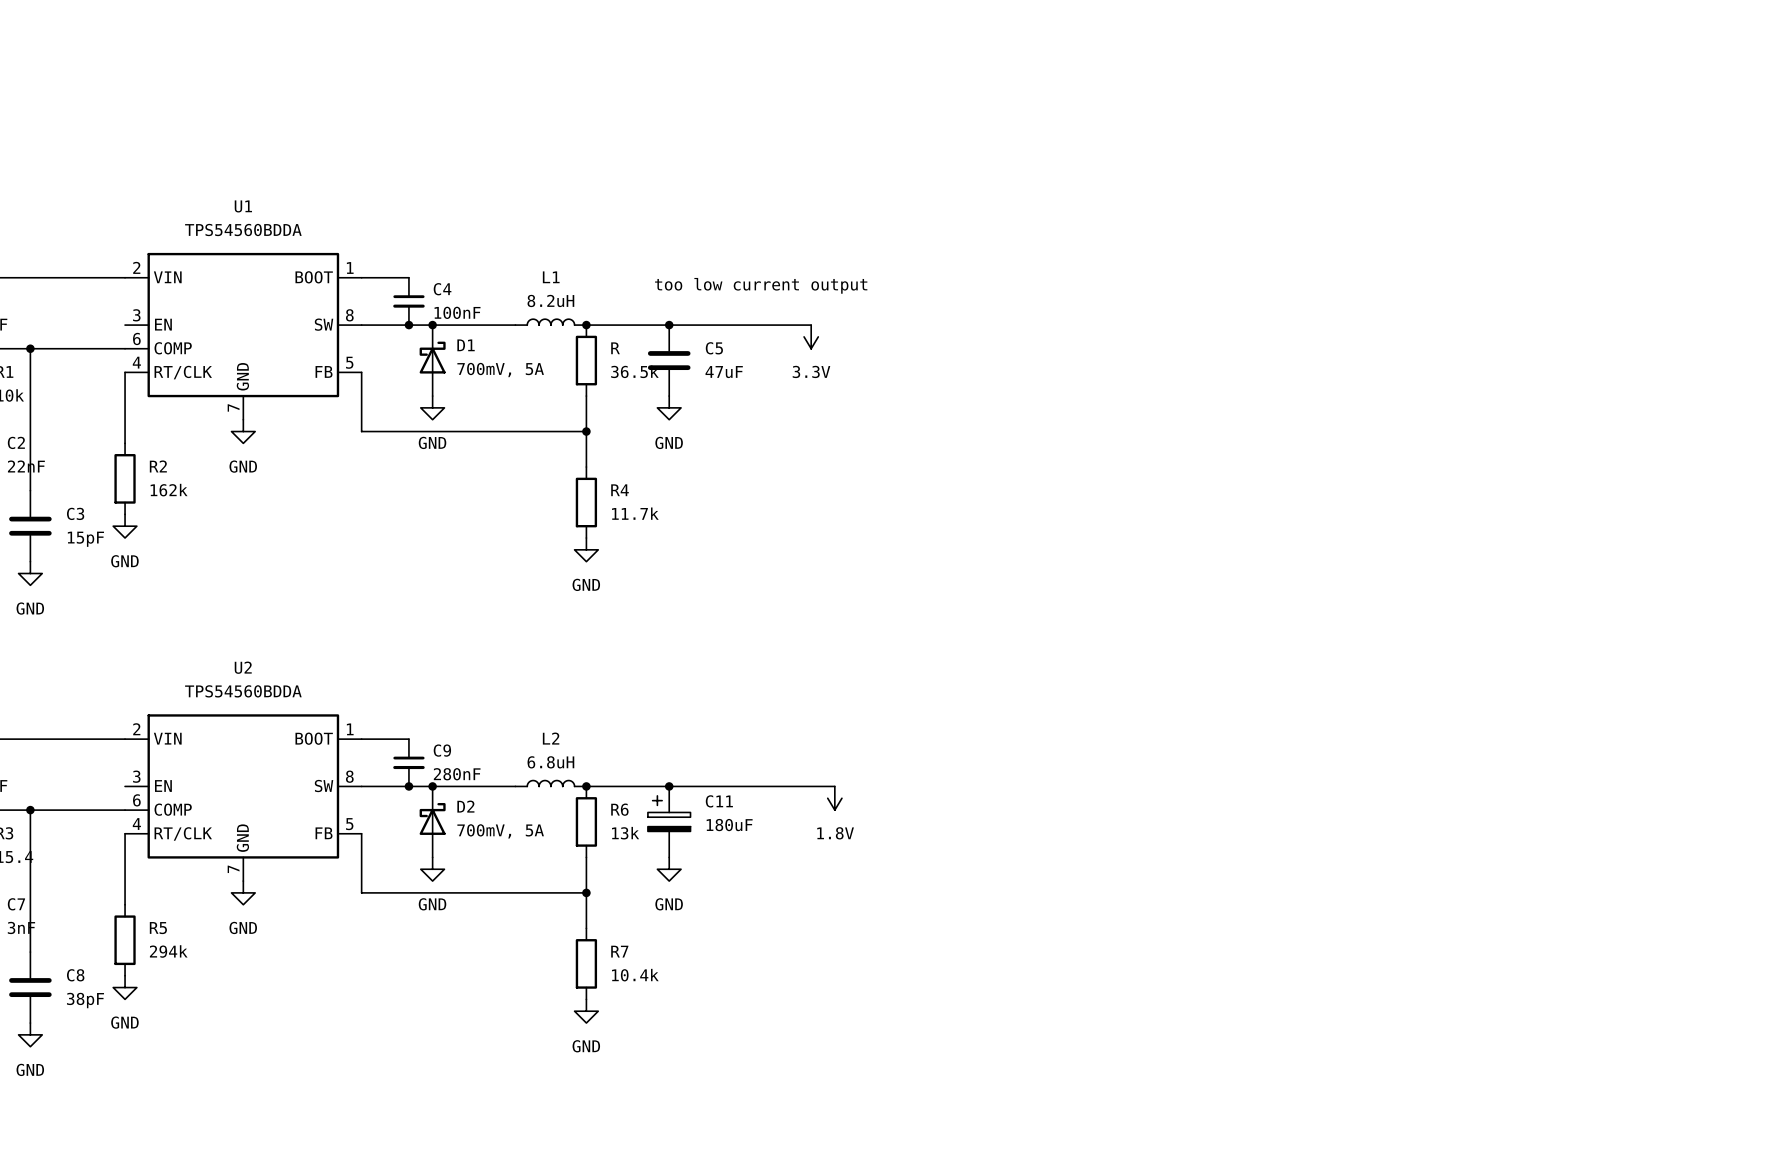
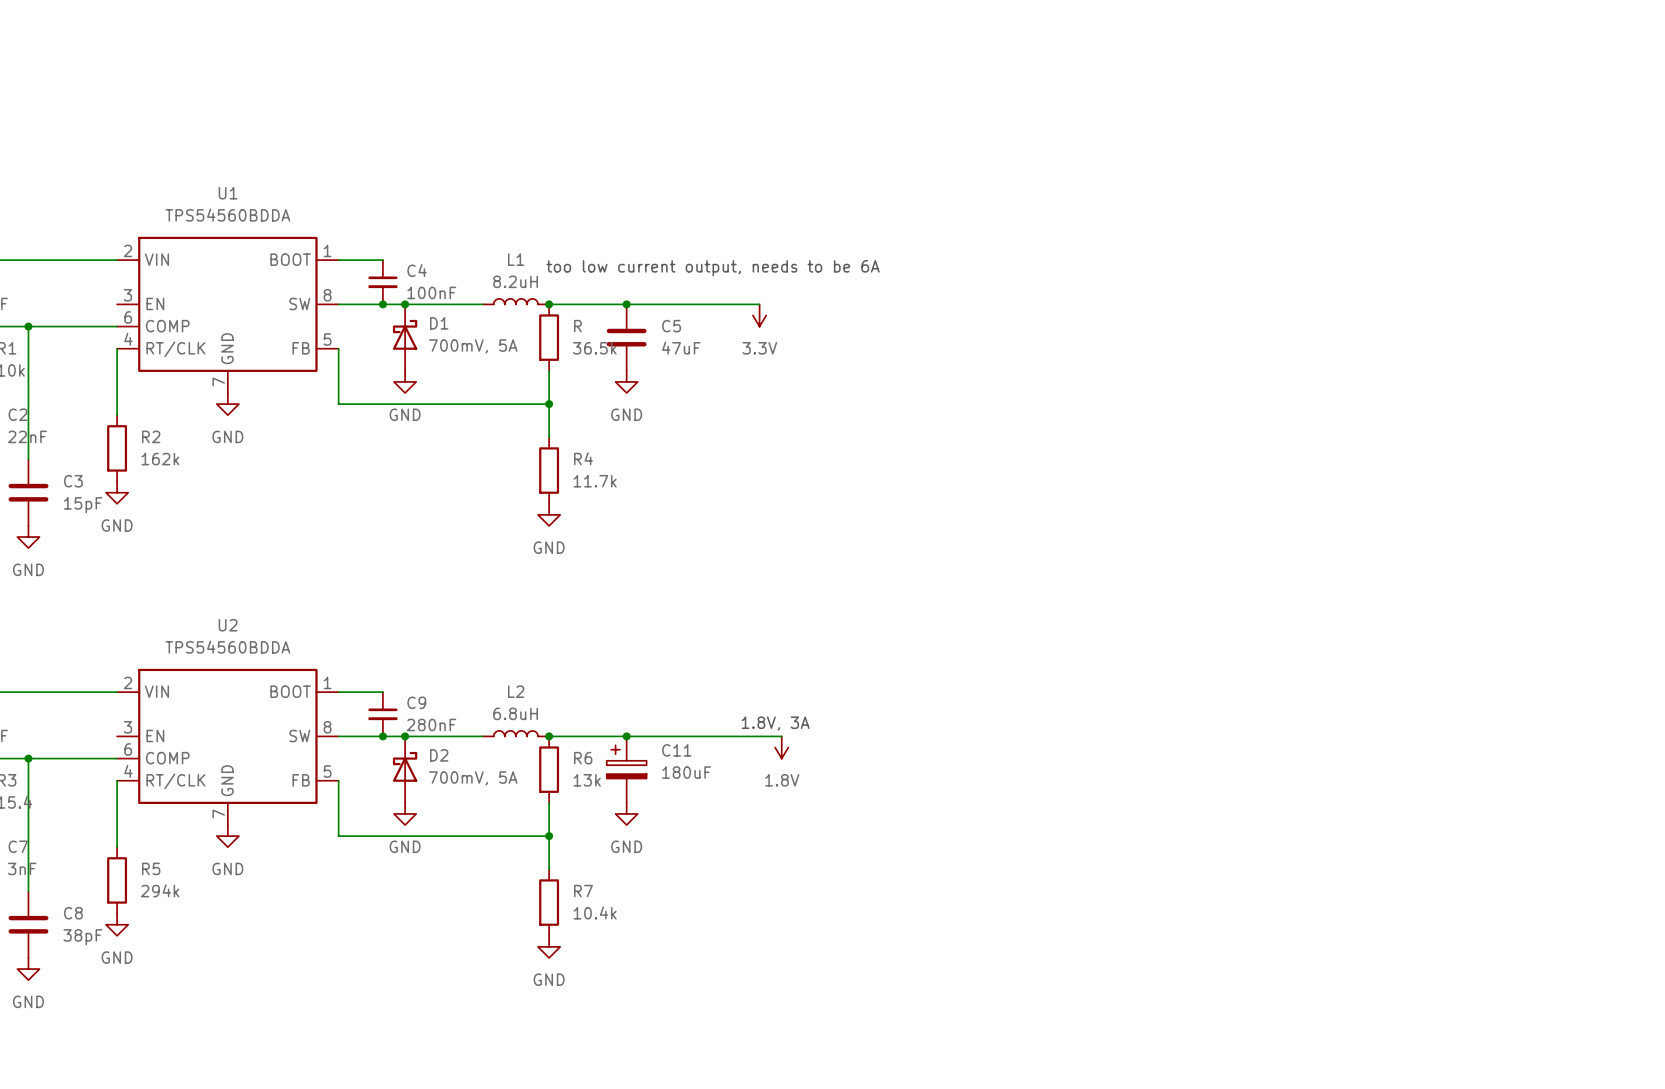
text: too low current output (761, 285) -> too low current output, needs to be 6A (713, 268)
text: none -> 1.8V, 3A (775, 723)

